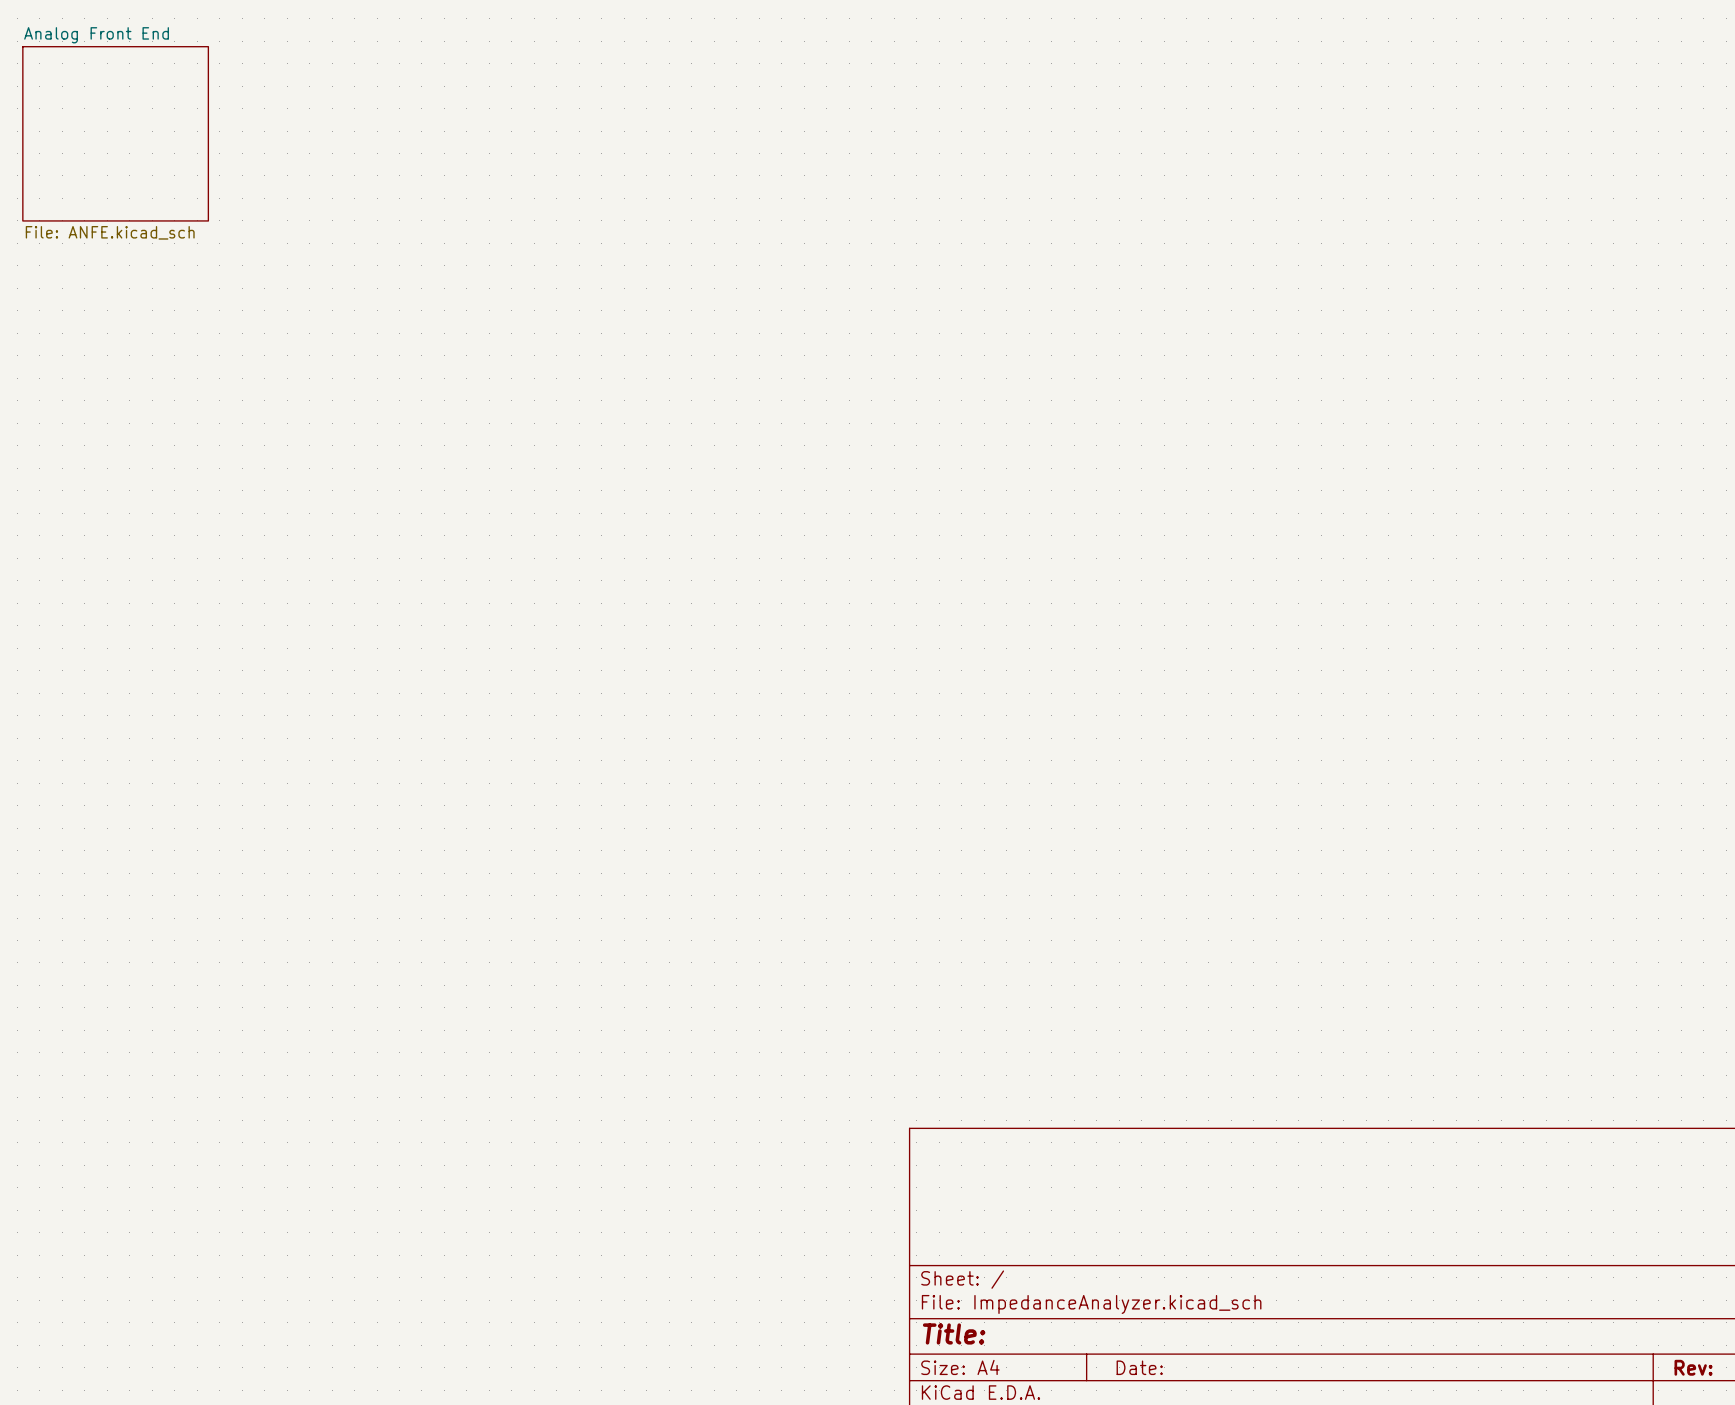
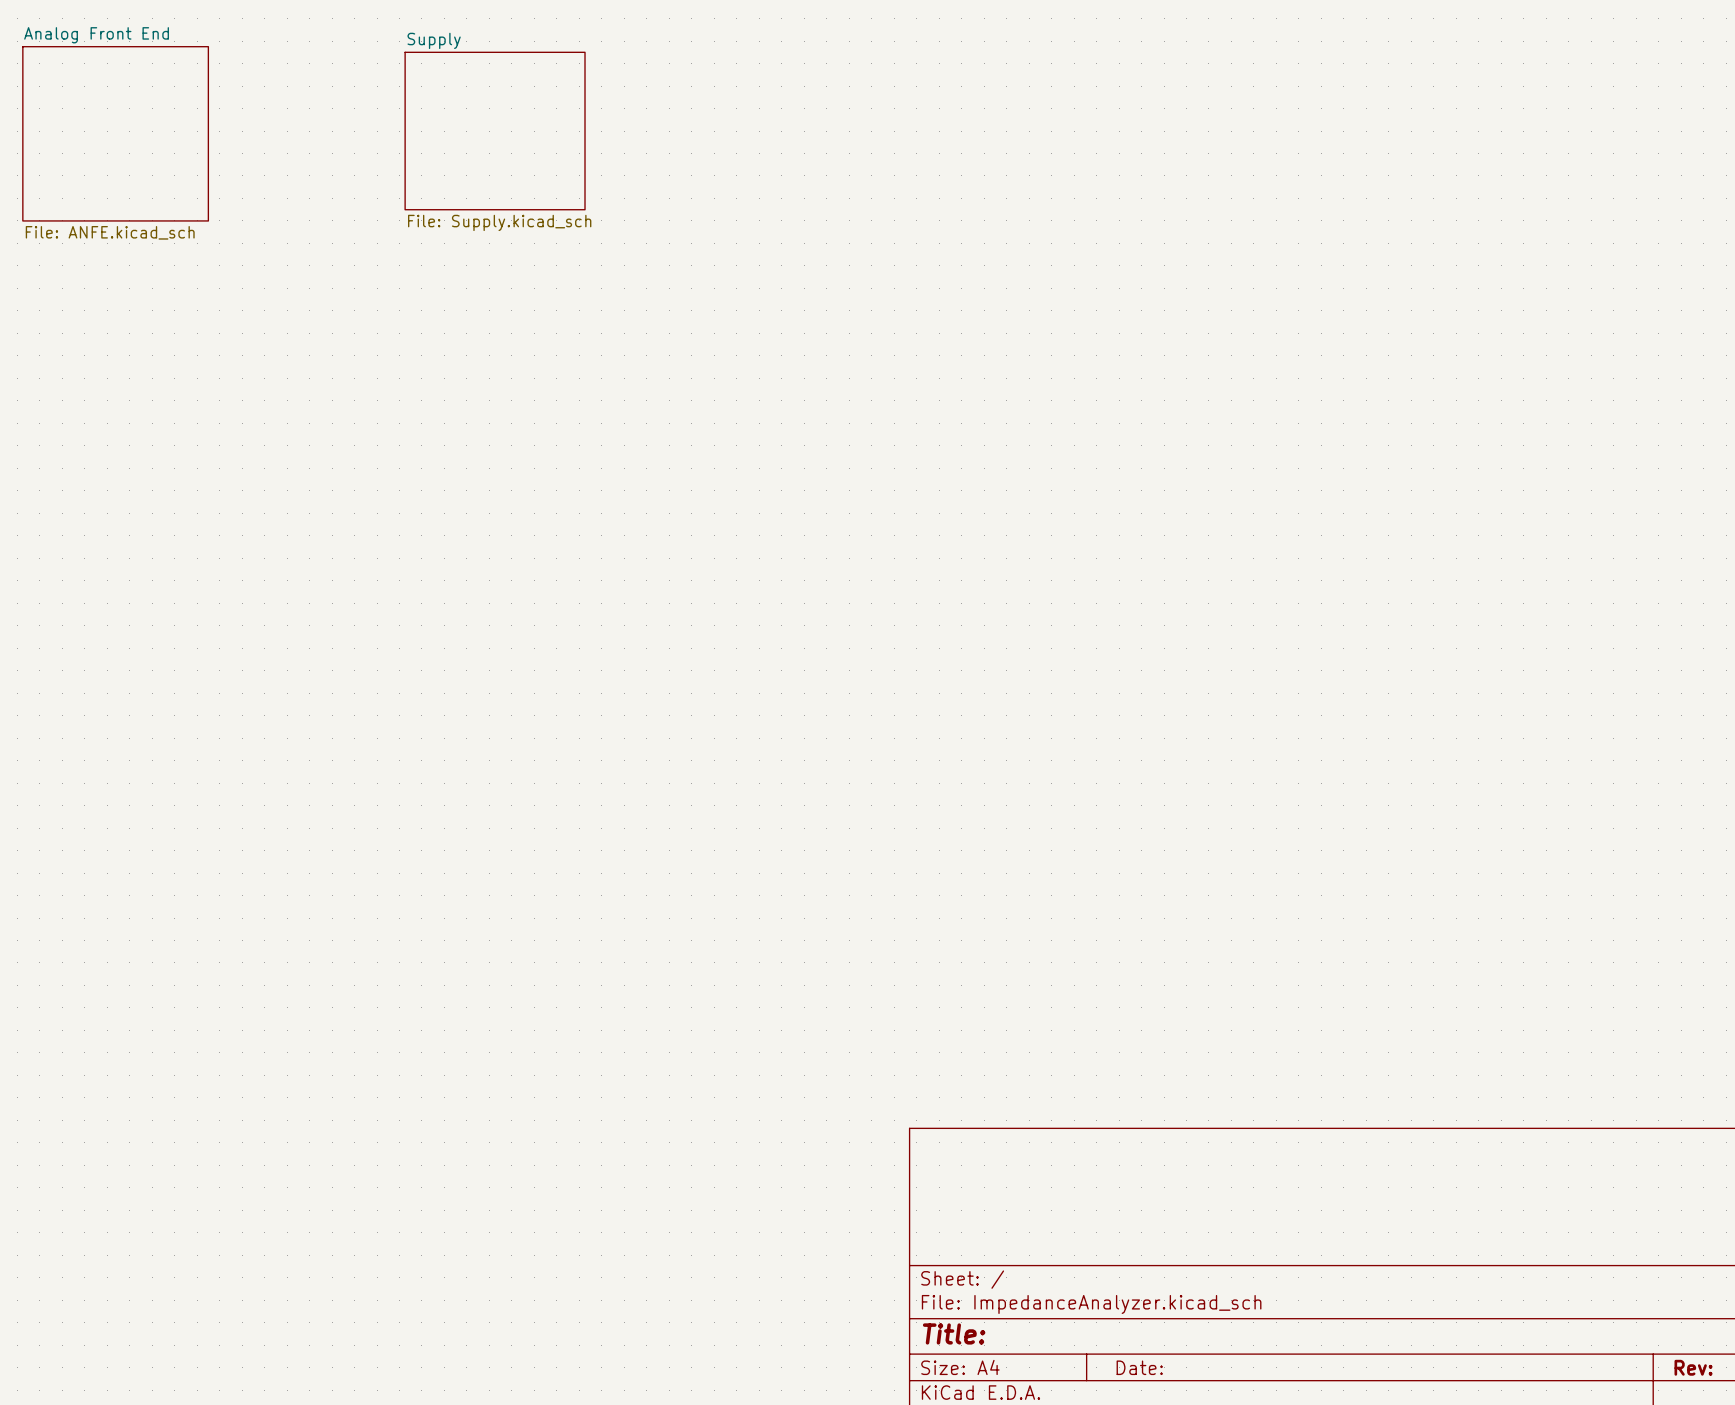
sheet Supply: none -> File: Supply.kicad_sch (495, 131)

